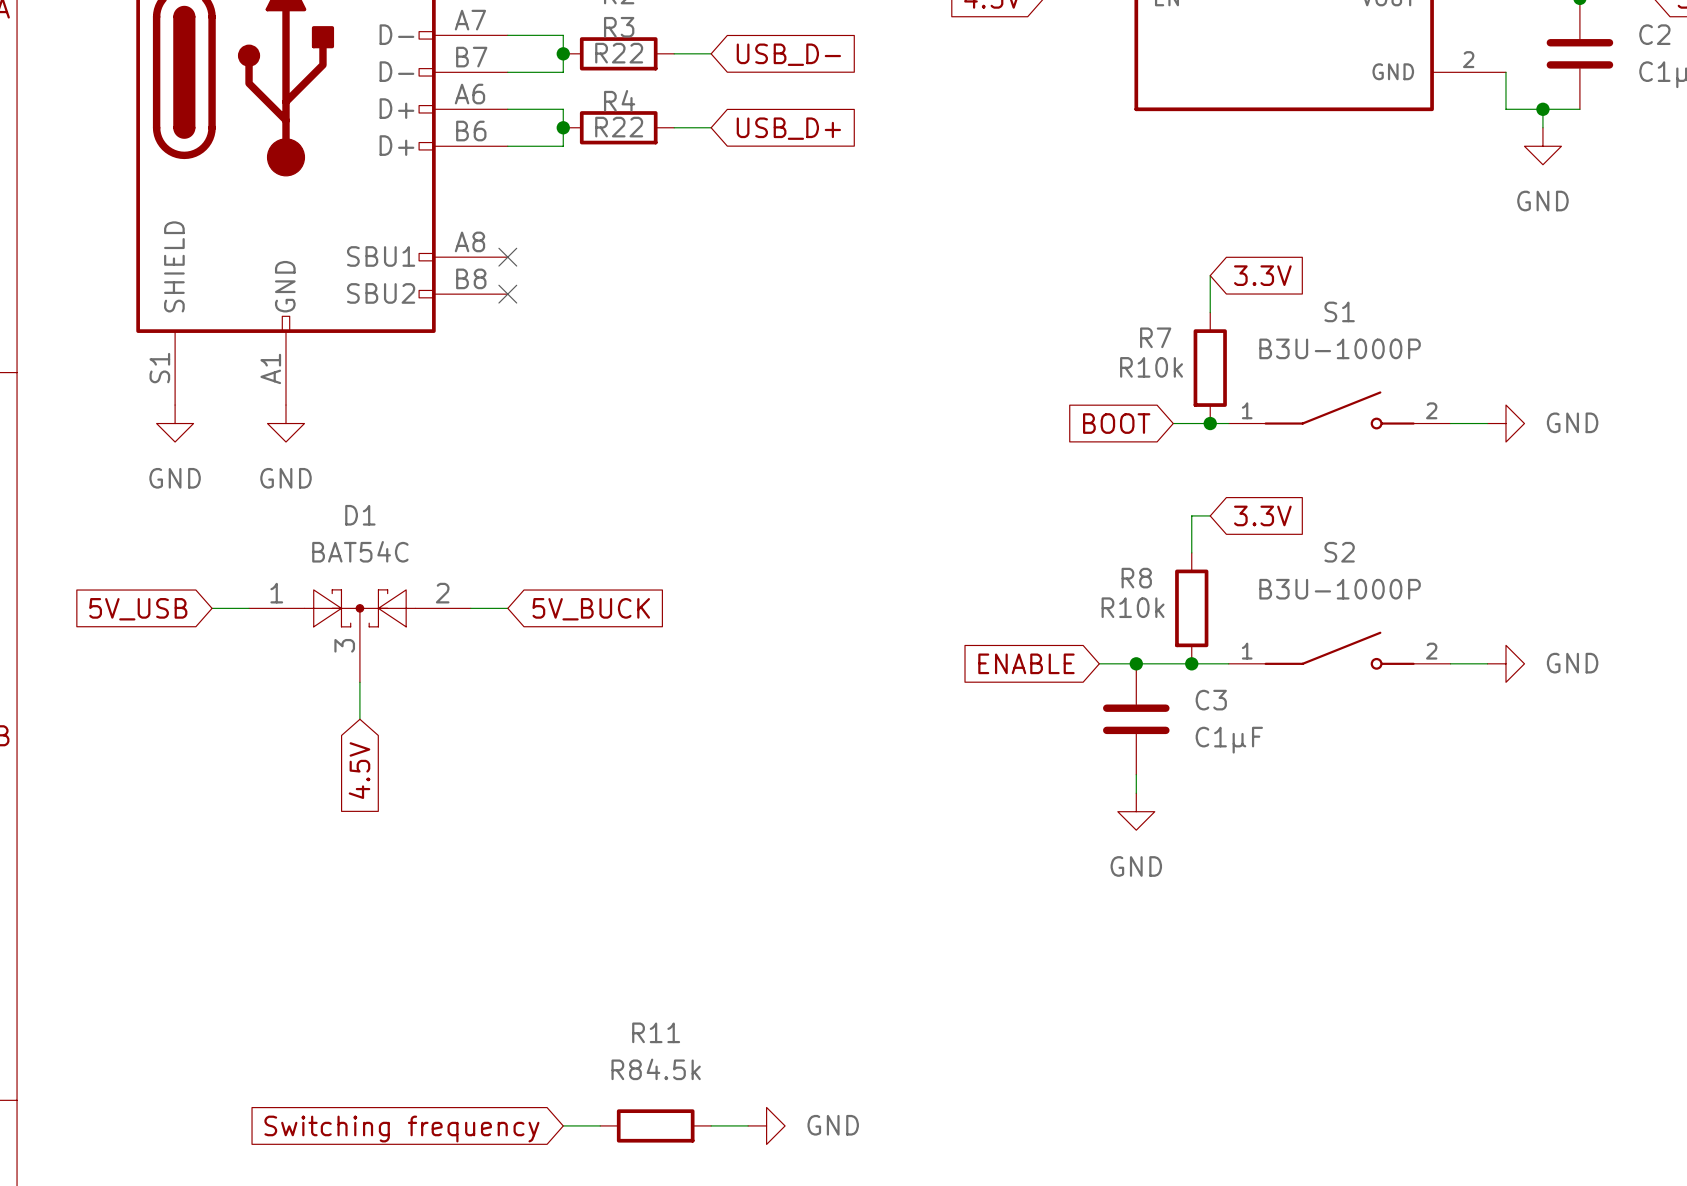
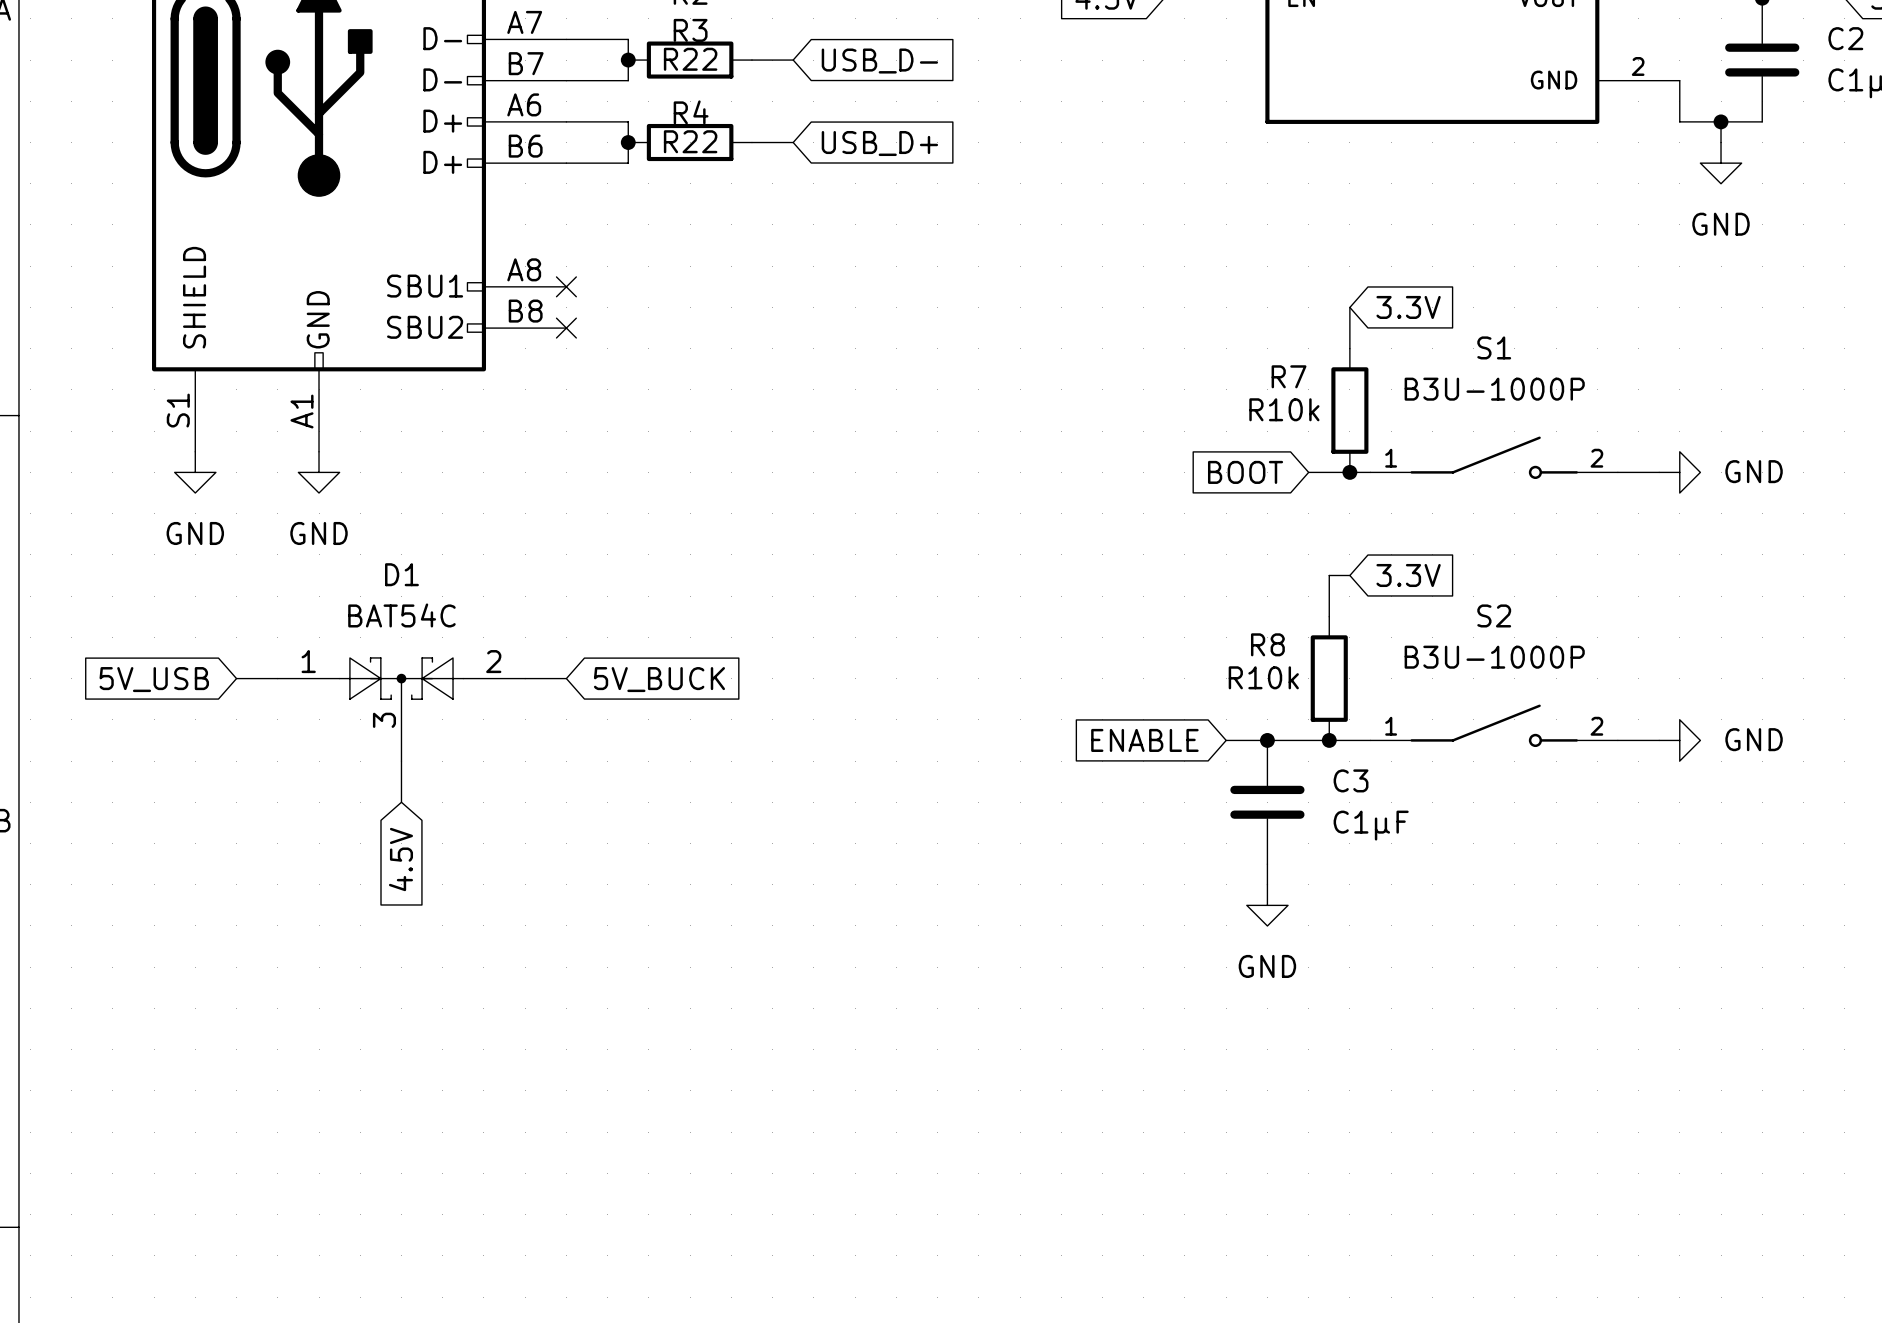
wire: (563, 1125) (600, 1125) -> none
R11: R84.5k (655, 1125) -> none
wire: (711, 1125) (748, 1125) -> none
power symbol: GND (766, 1125) -> none
global label: Switching frequency (401, 1129) -> none

